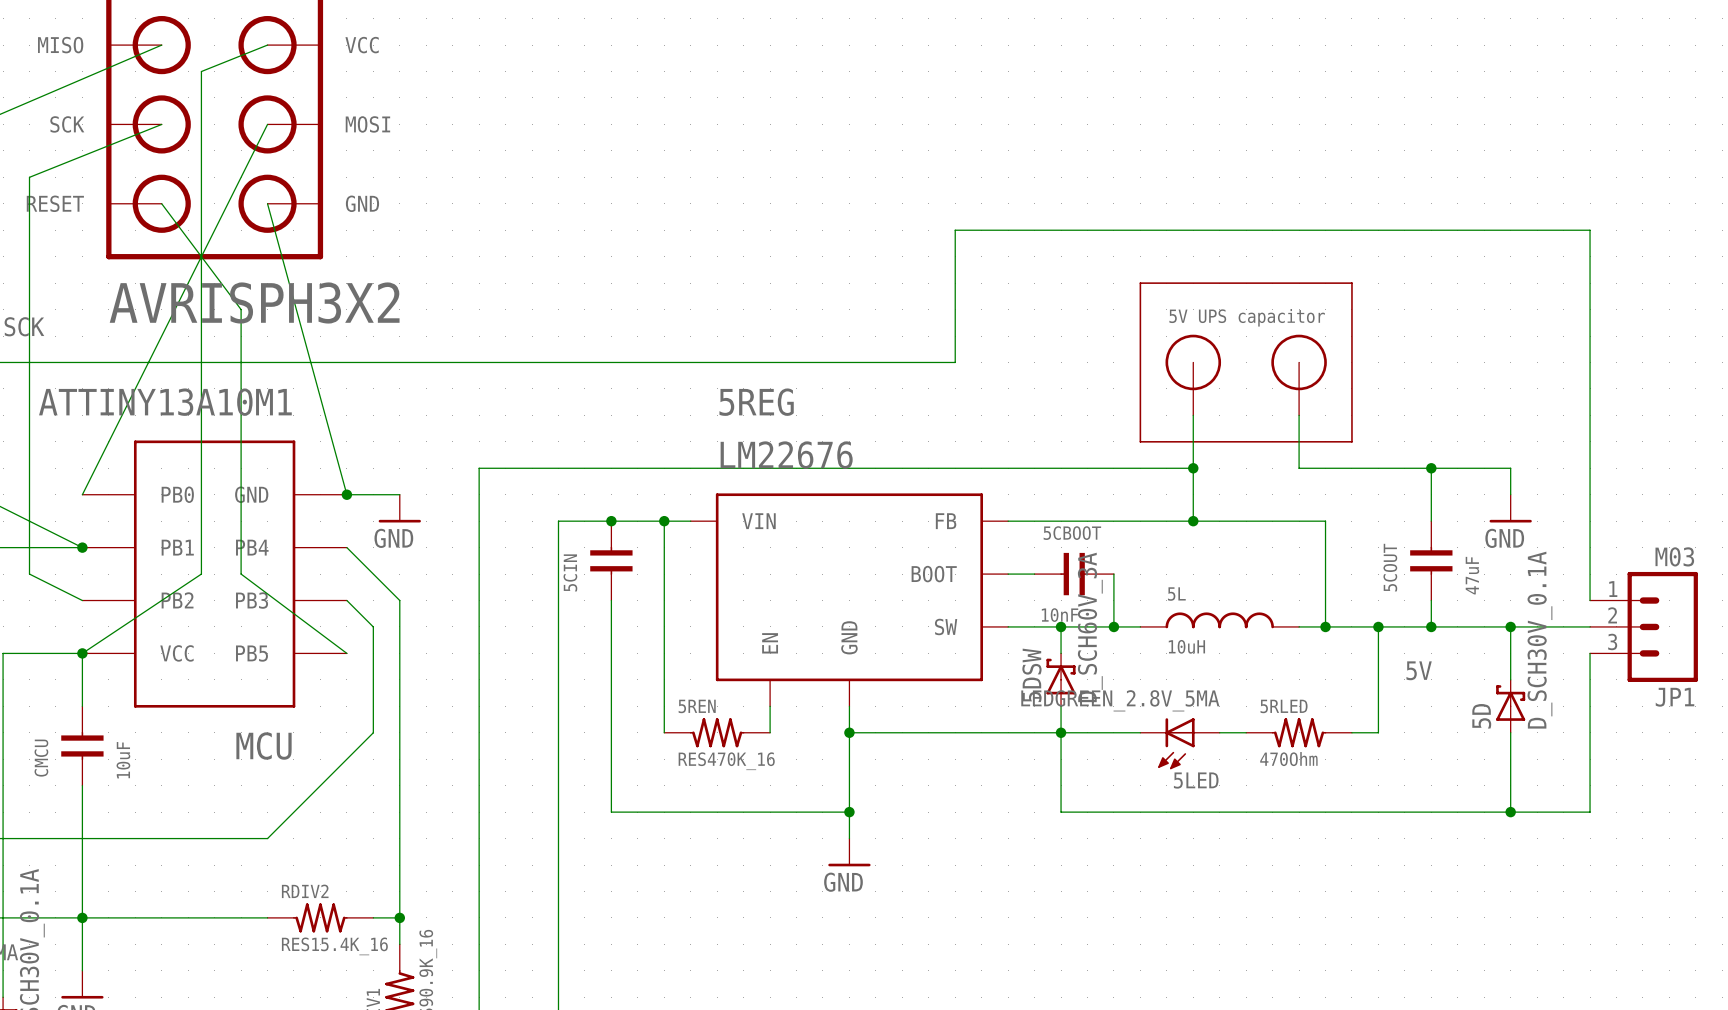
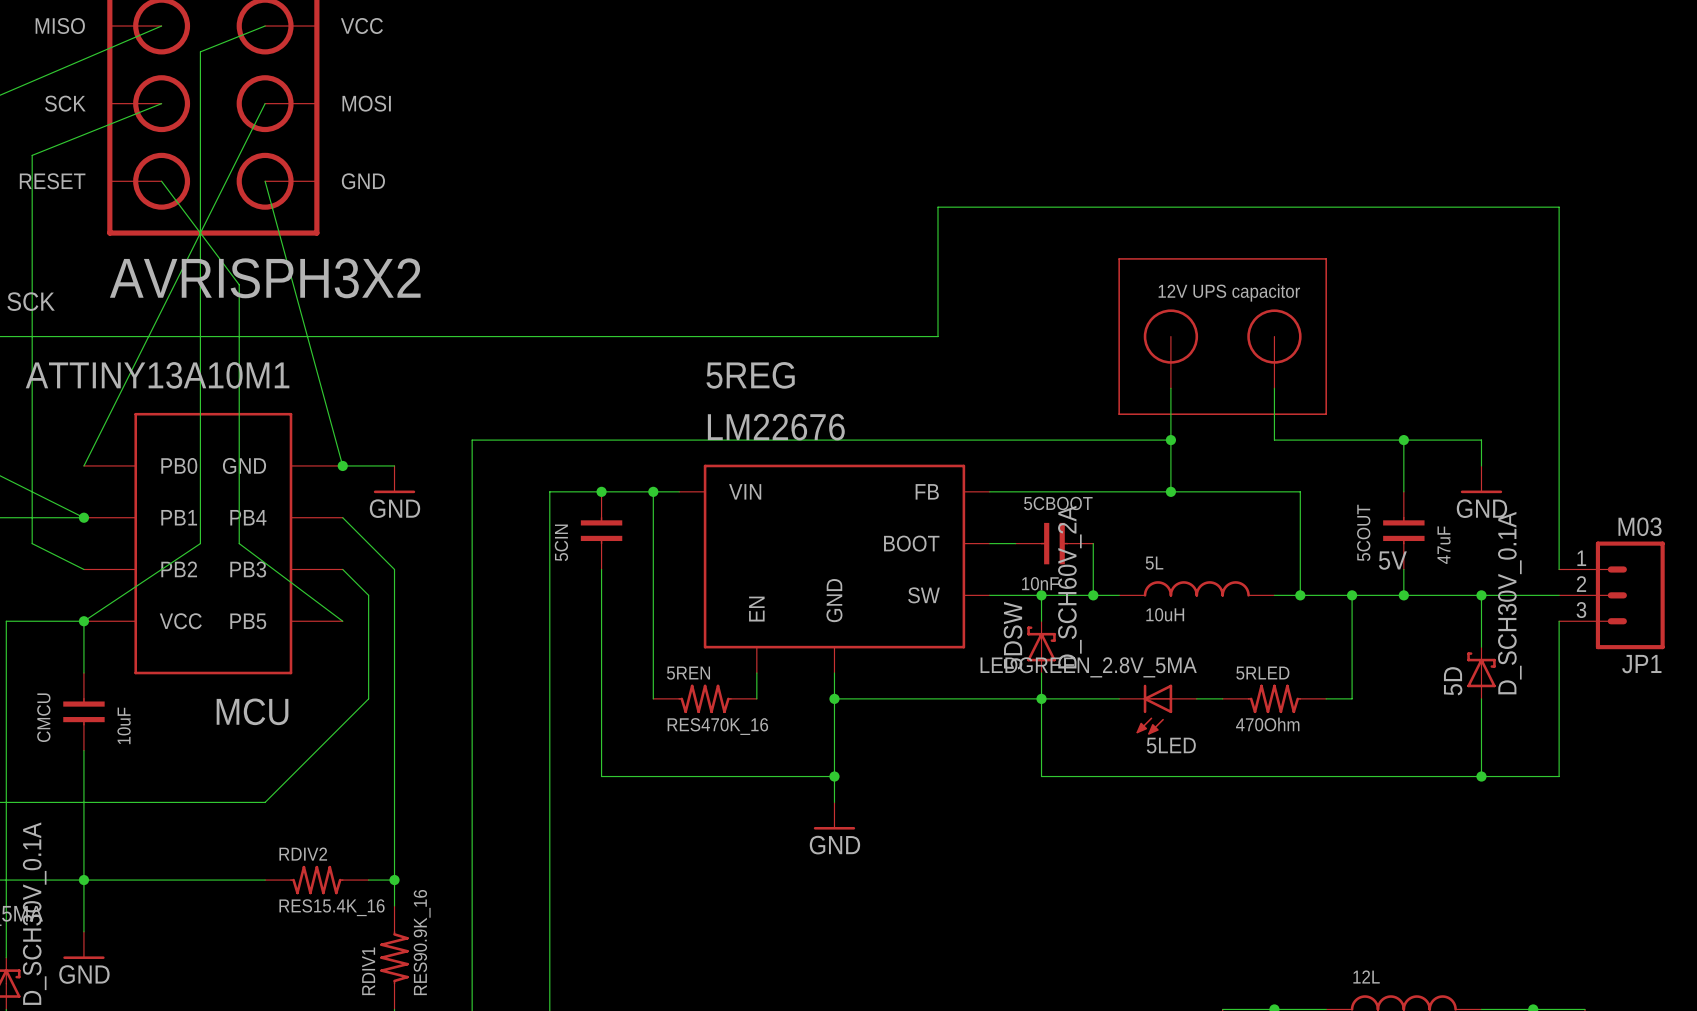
text: 5V UPS capacitor (1247, 317) -> 12V UPS capacitor (1229, 292)
5DSW value: D_SCH60V_3A (1090, 627) -> D_SCH60V_2A (1069, 587)
label position: 5V (1419, 670) -> 5V (1392, 560)

